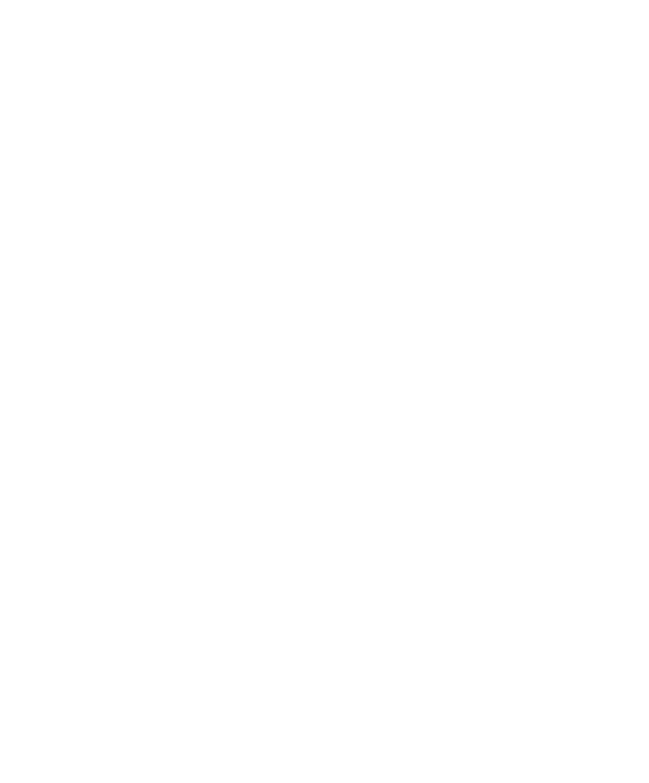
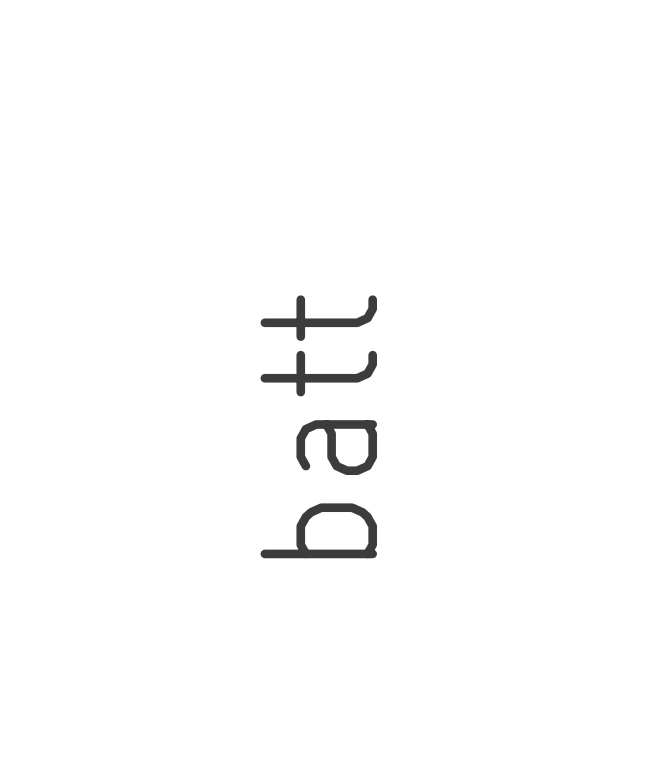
text: none -> batt (318, 426)

